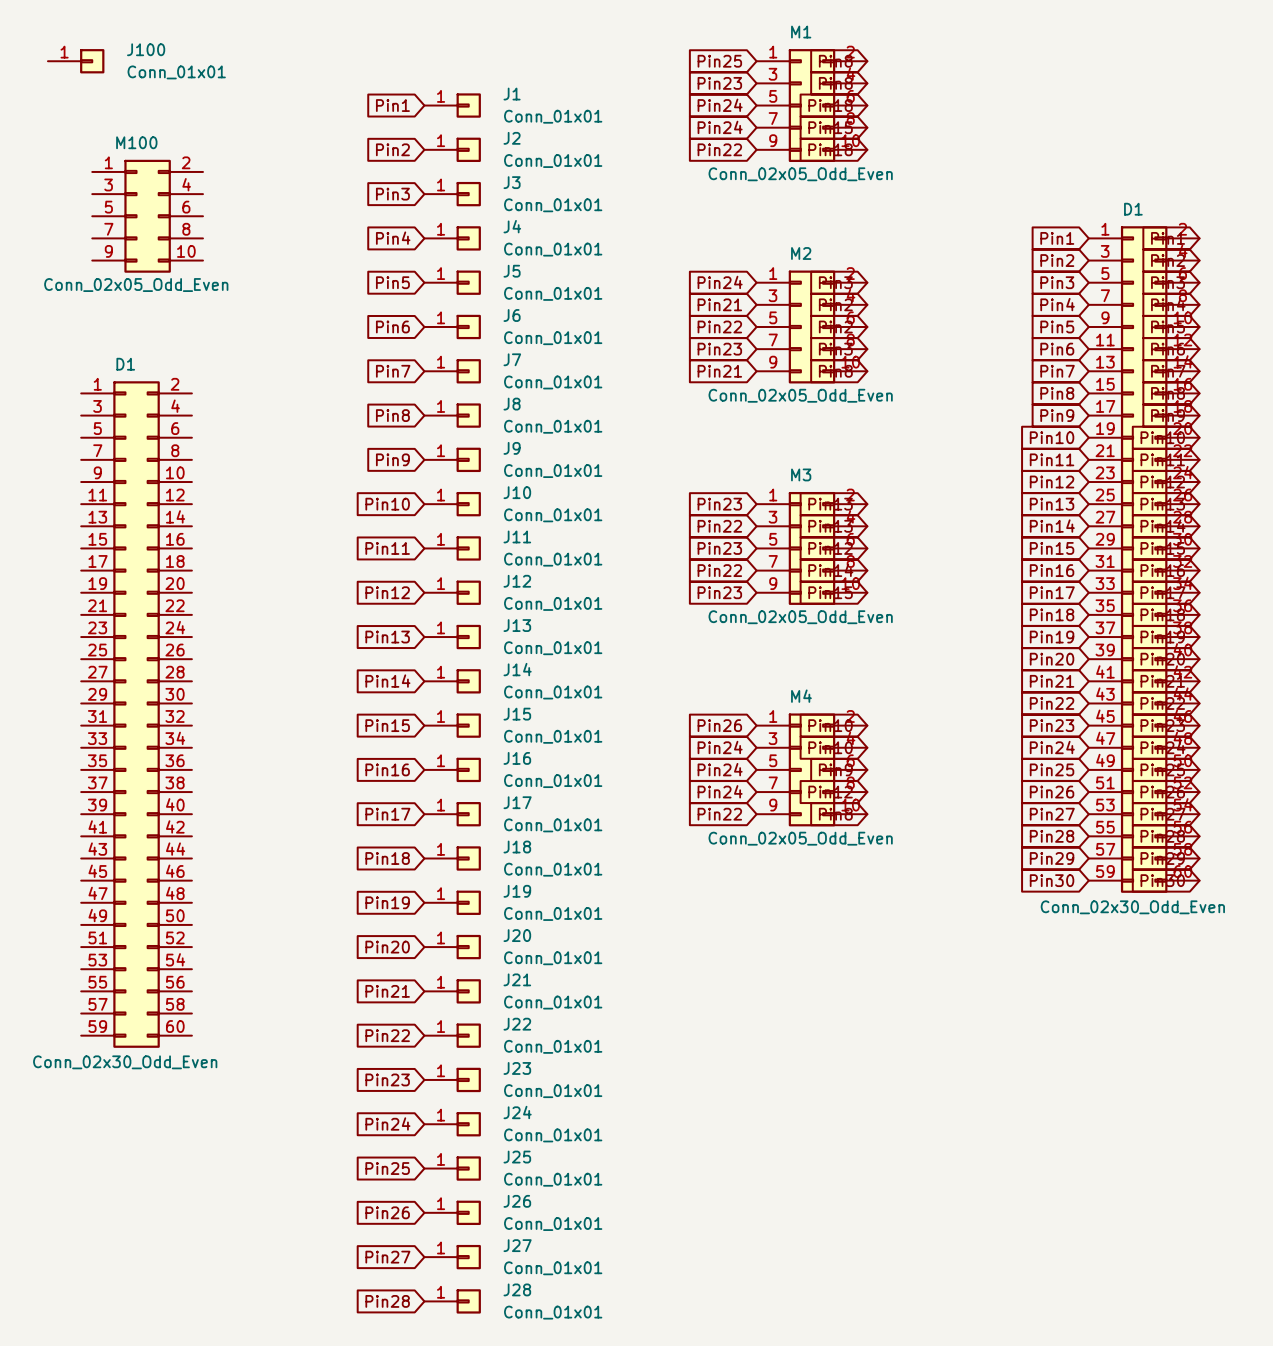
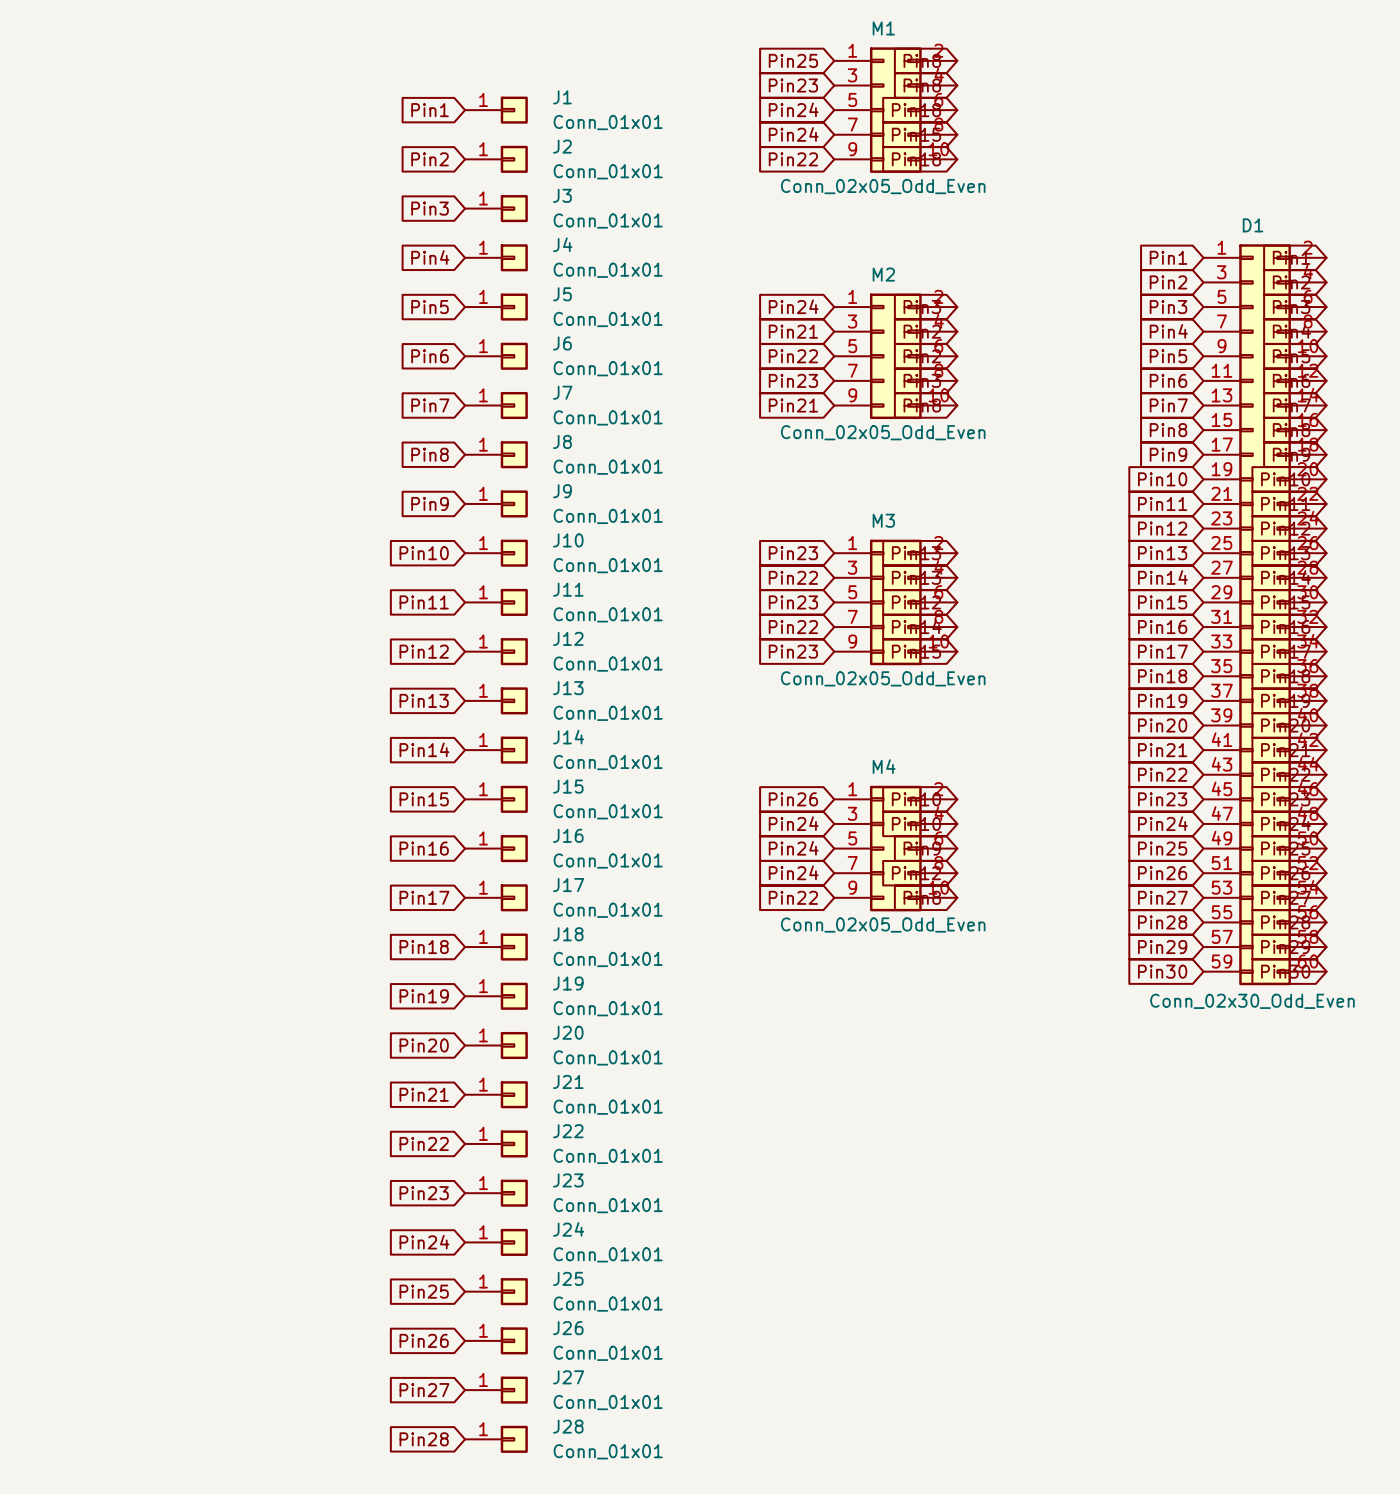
J100: Conn_01x01 (76, 61) -> none
M100: Conn_02x05_Odd_Even (147, 216) -> none
D1: Conn_02x30_Odd_Even (136, 714) -> none

